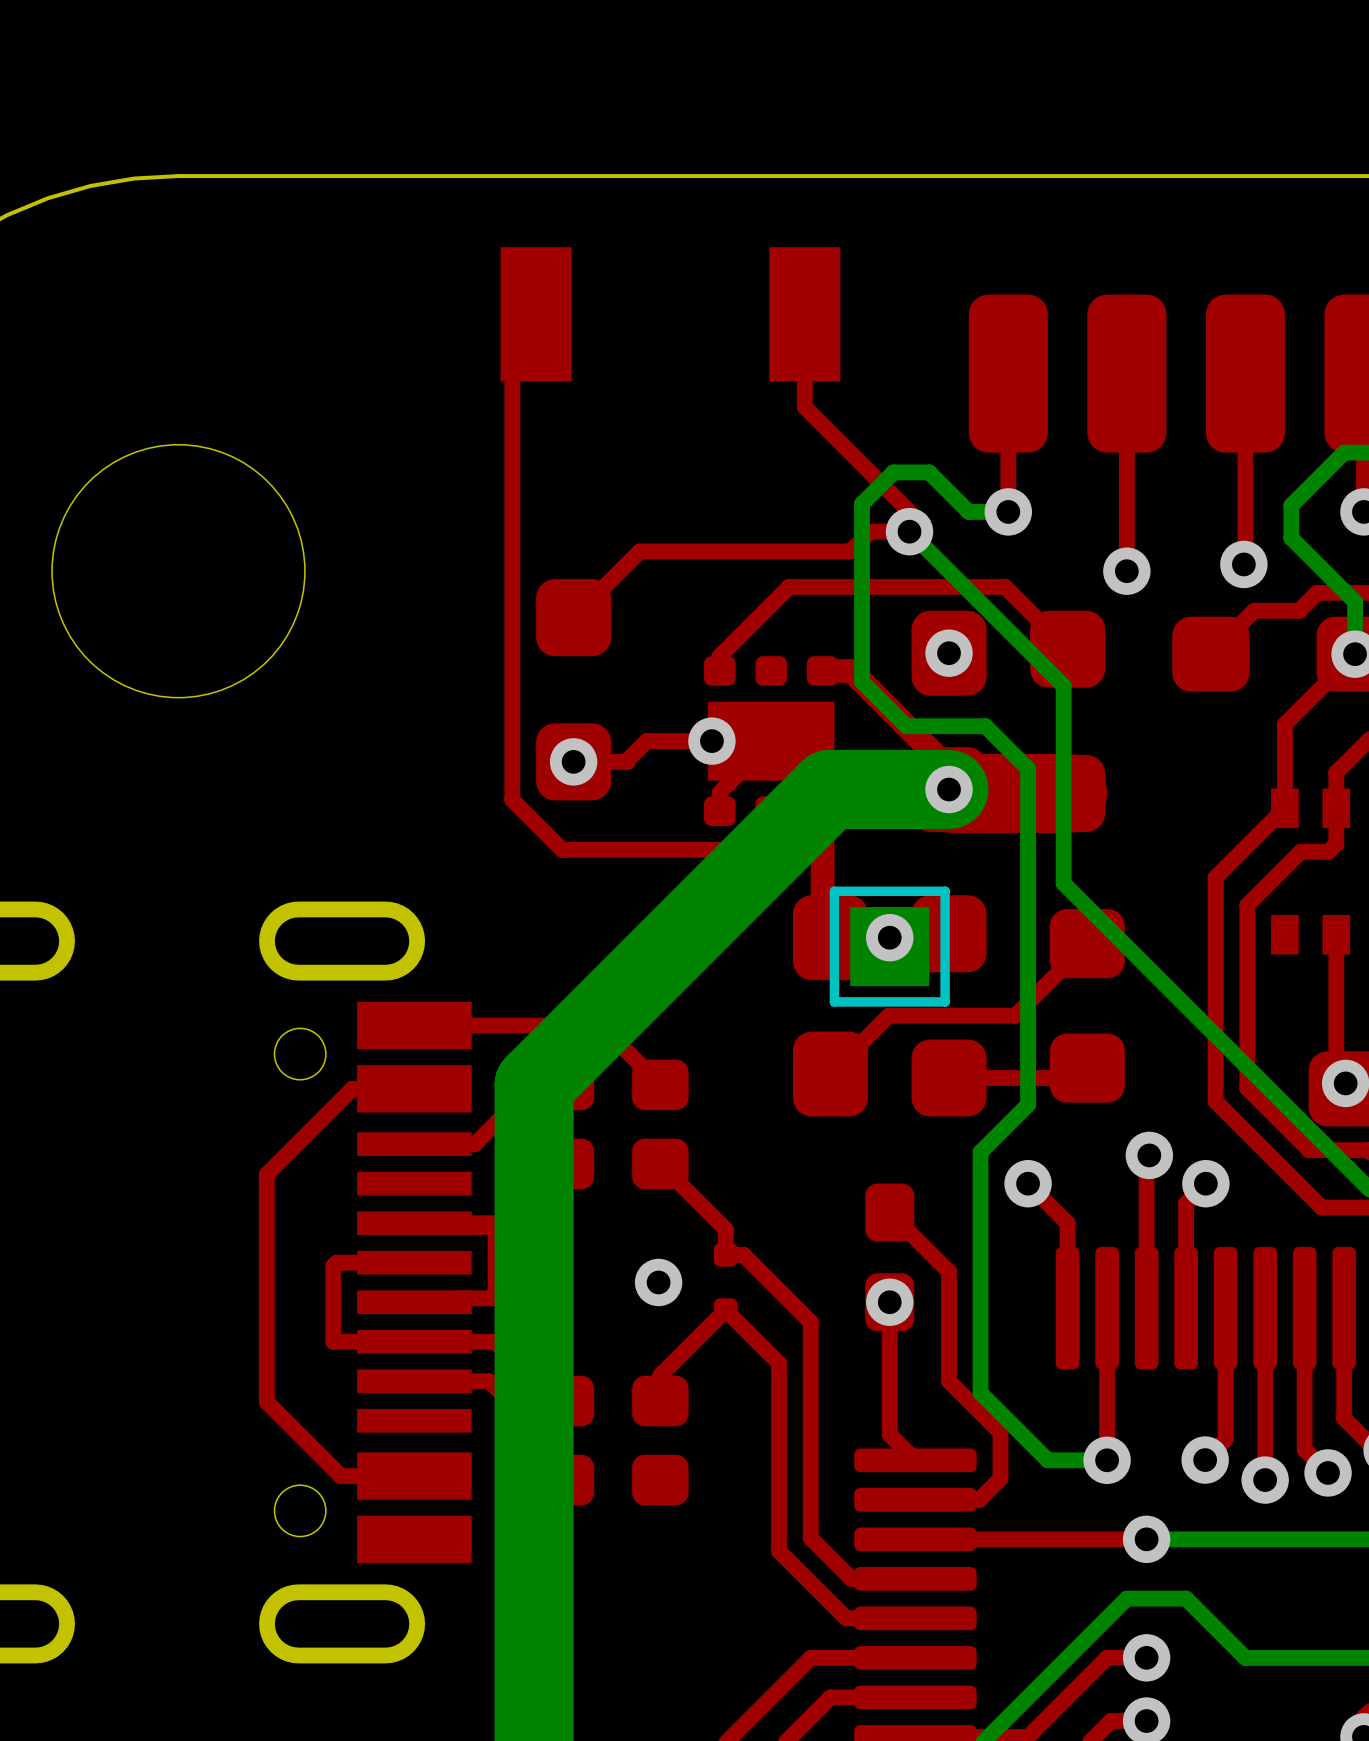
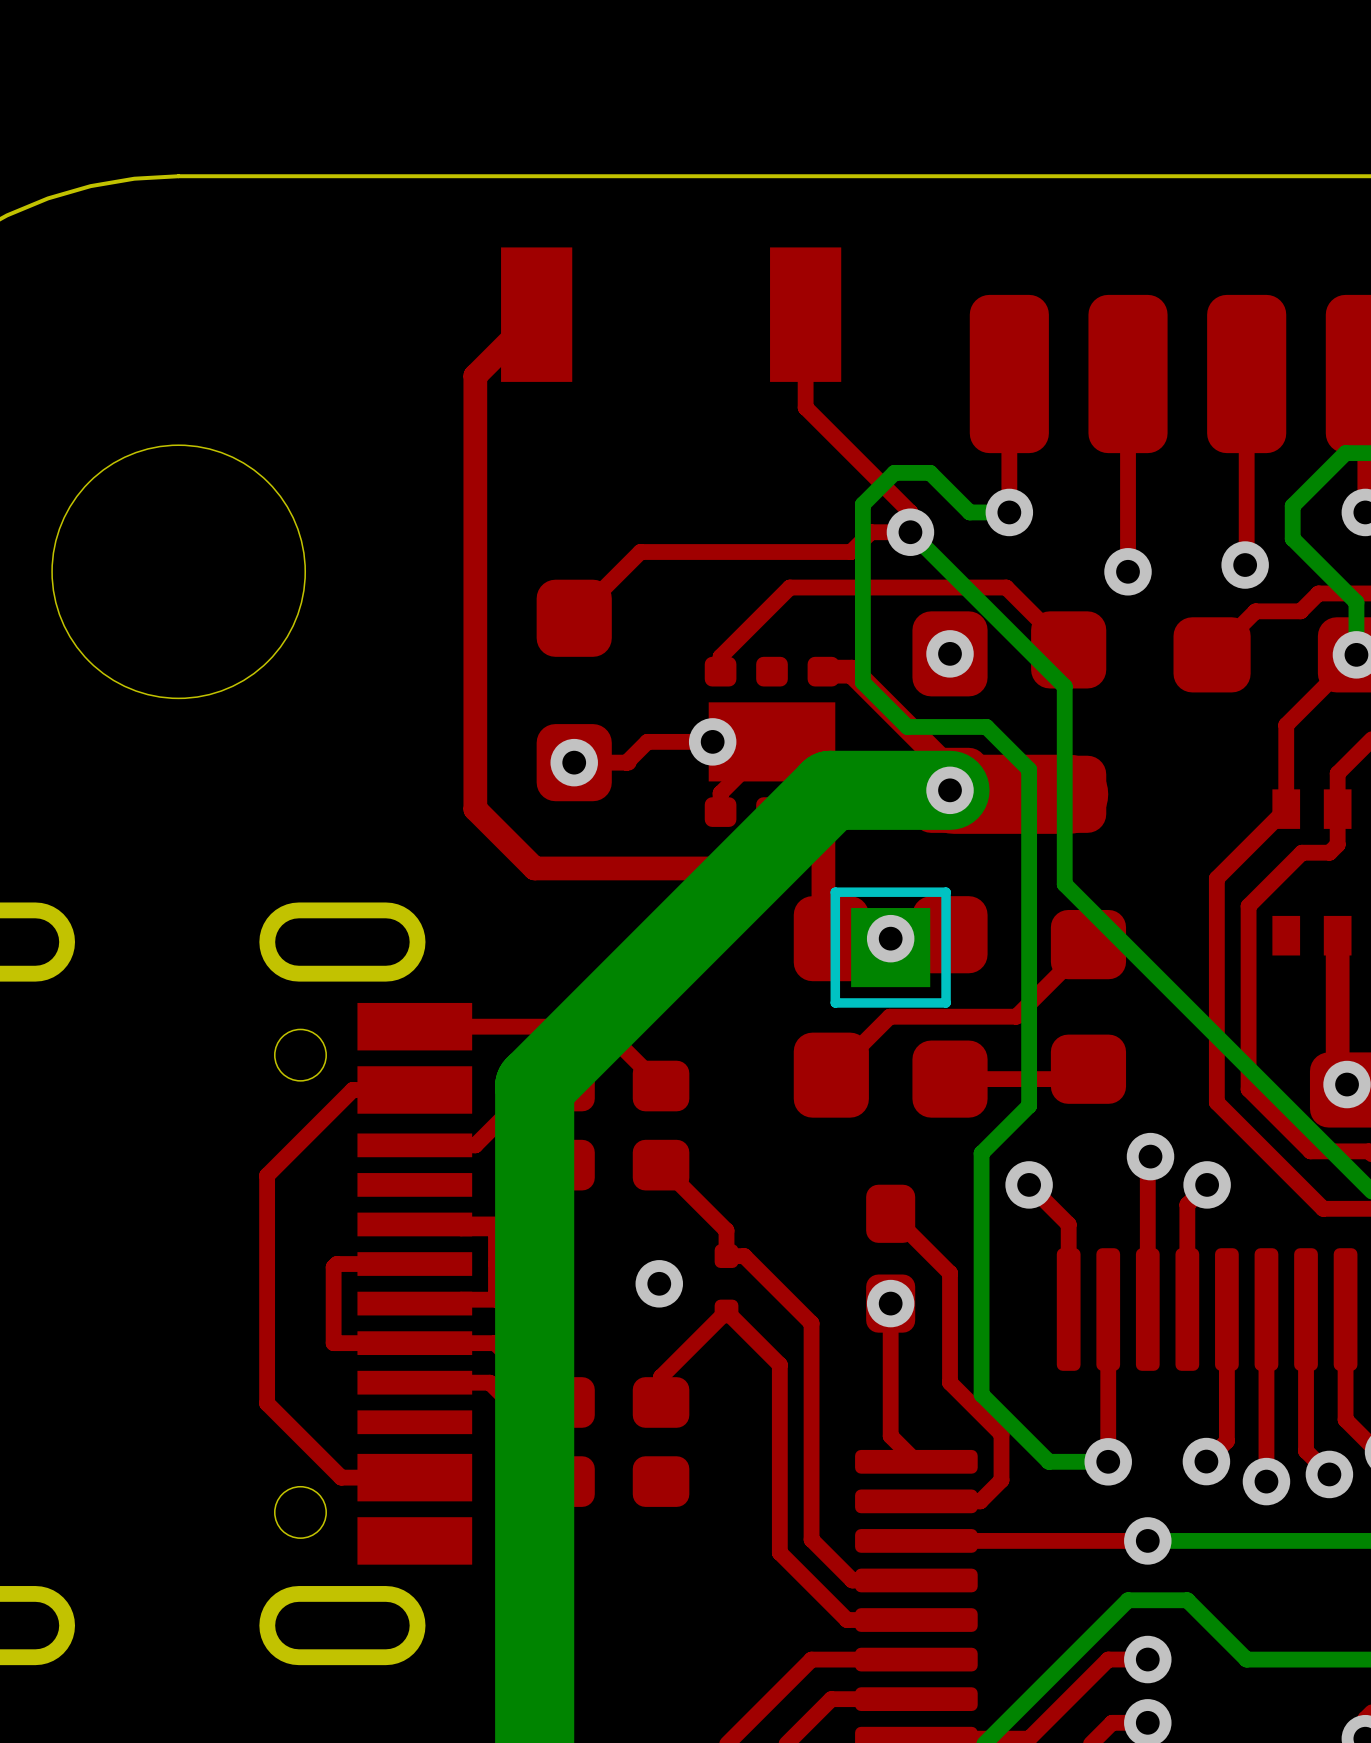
top track: (512, 338) (512, 799) (562, 849) (800, 849) -> (512, 338) (475, 375) (475, 809) (534, 868) (783, 868) (801, 850)
top track width: thin (1336, 934) (1336, 1074) -> thick (1337, 935) (1337, 1075)

